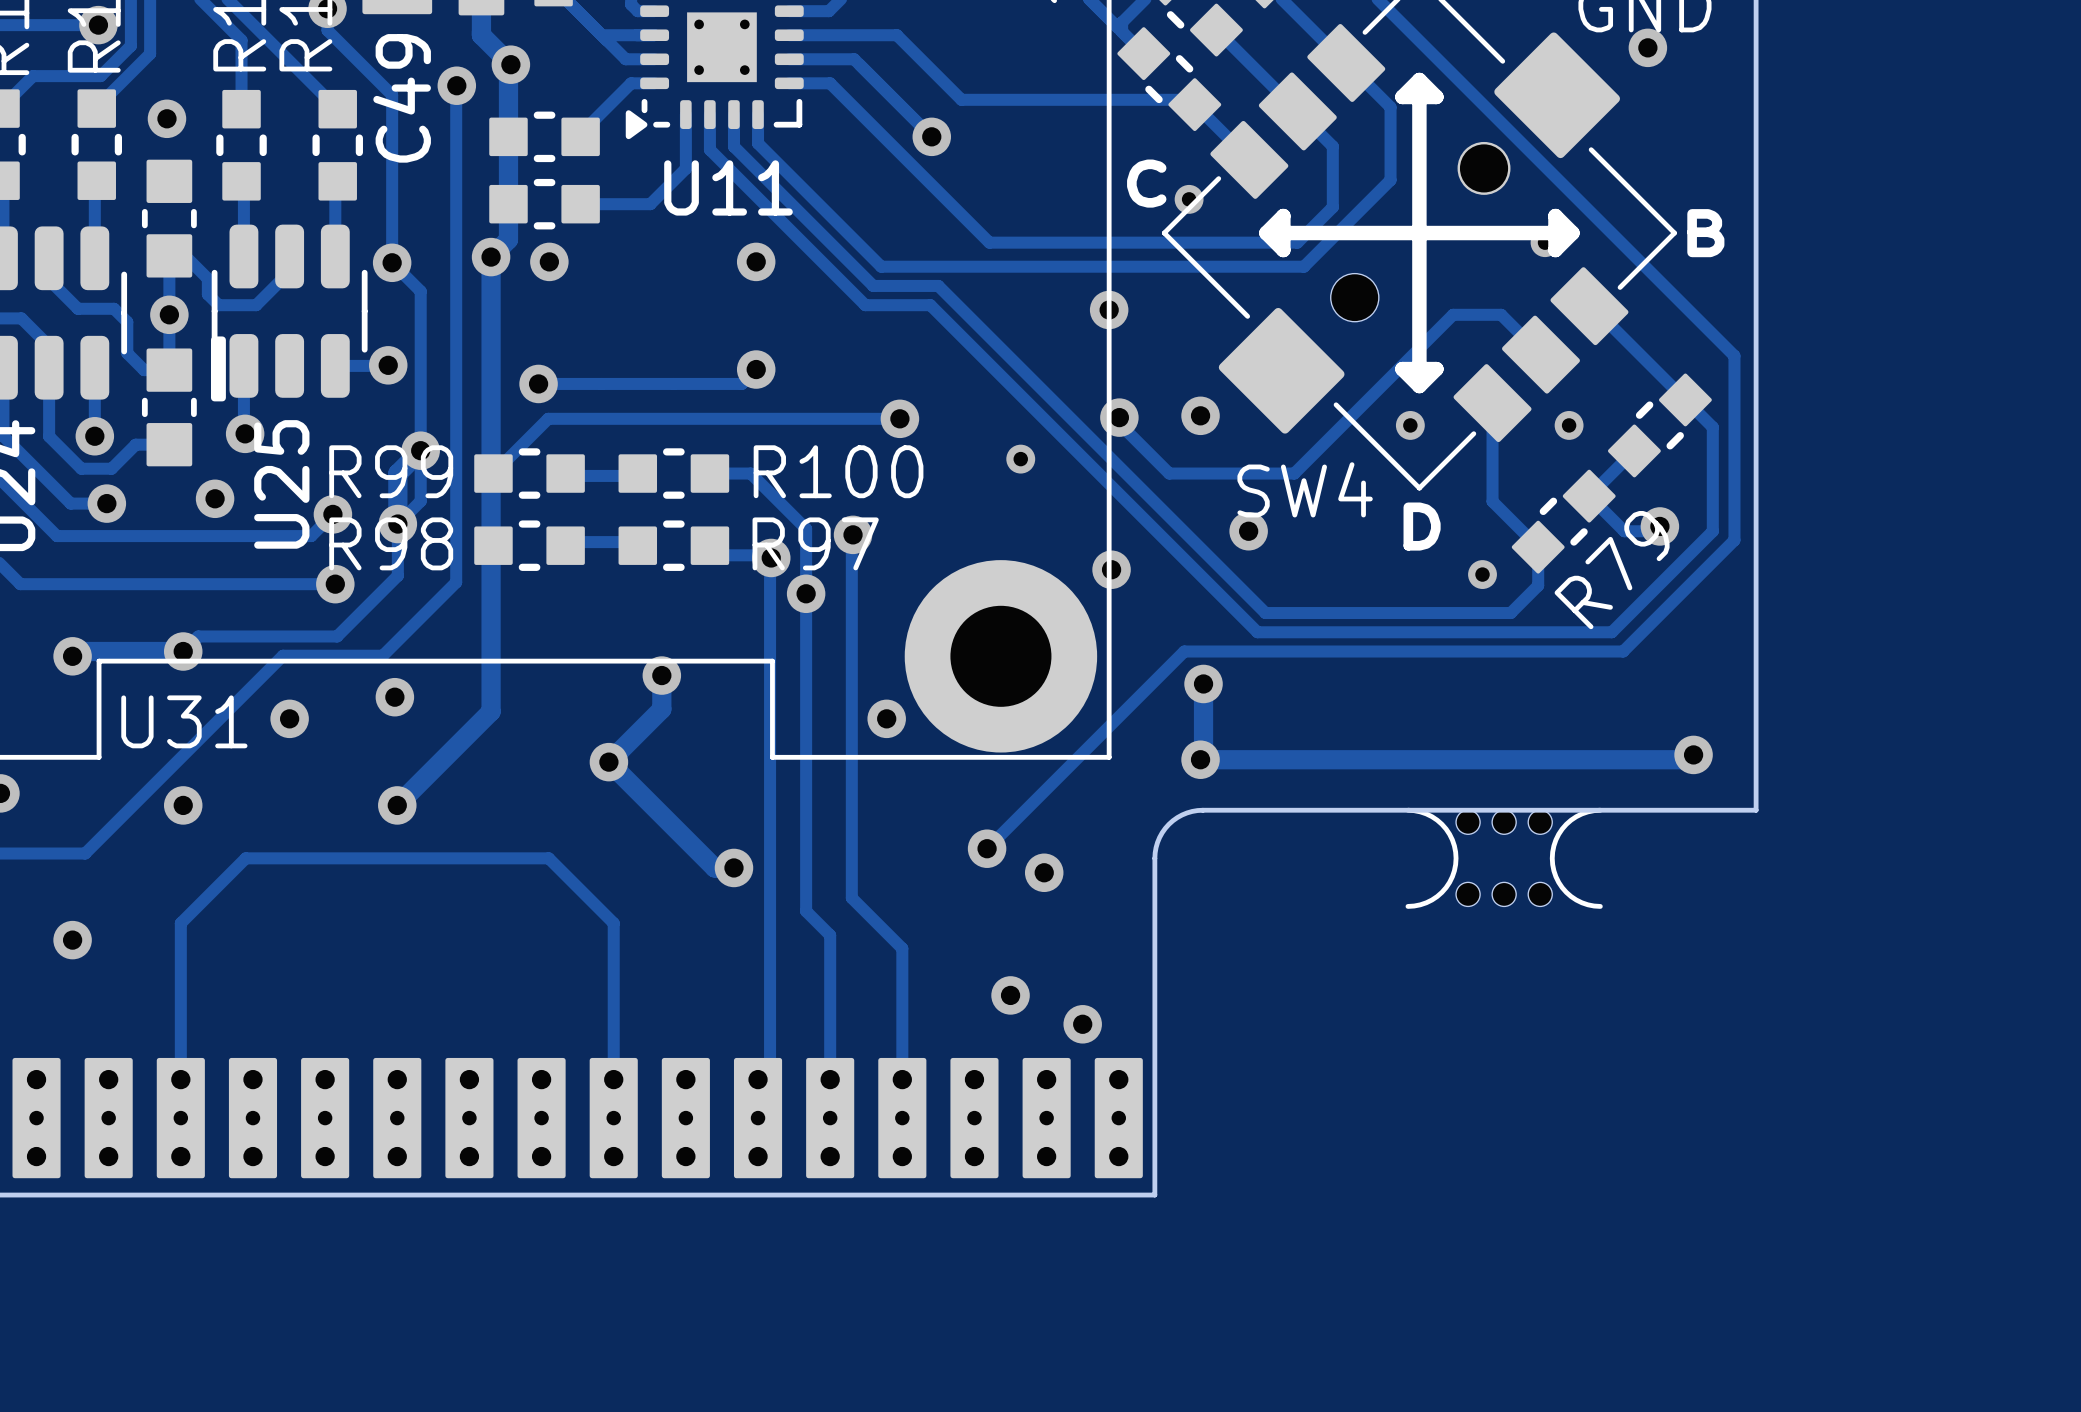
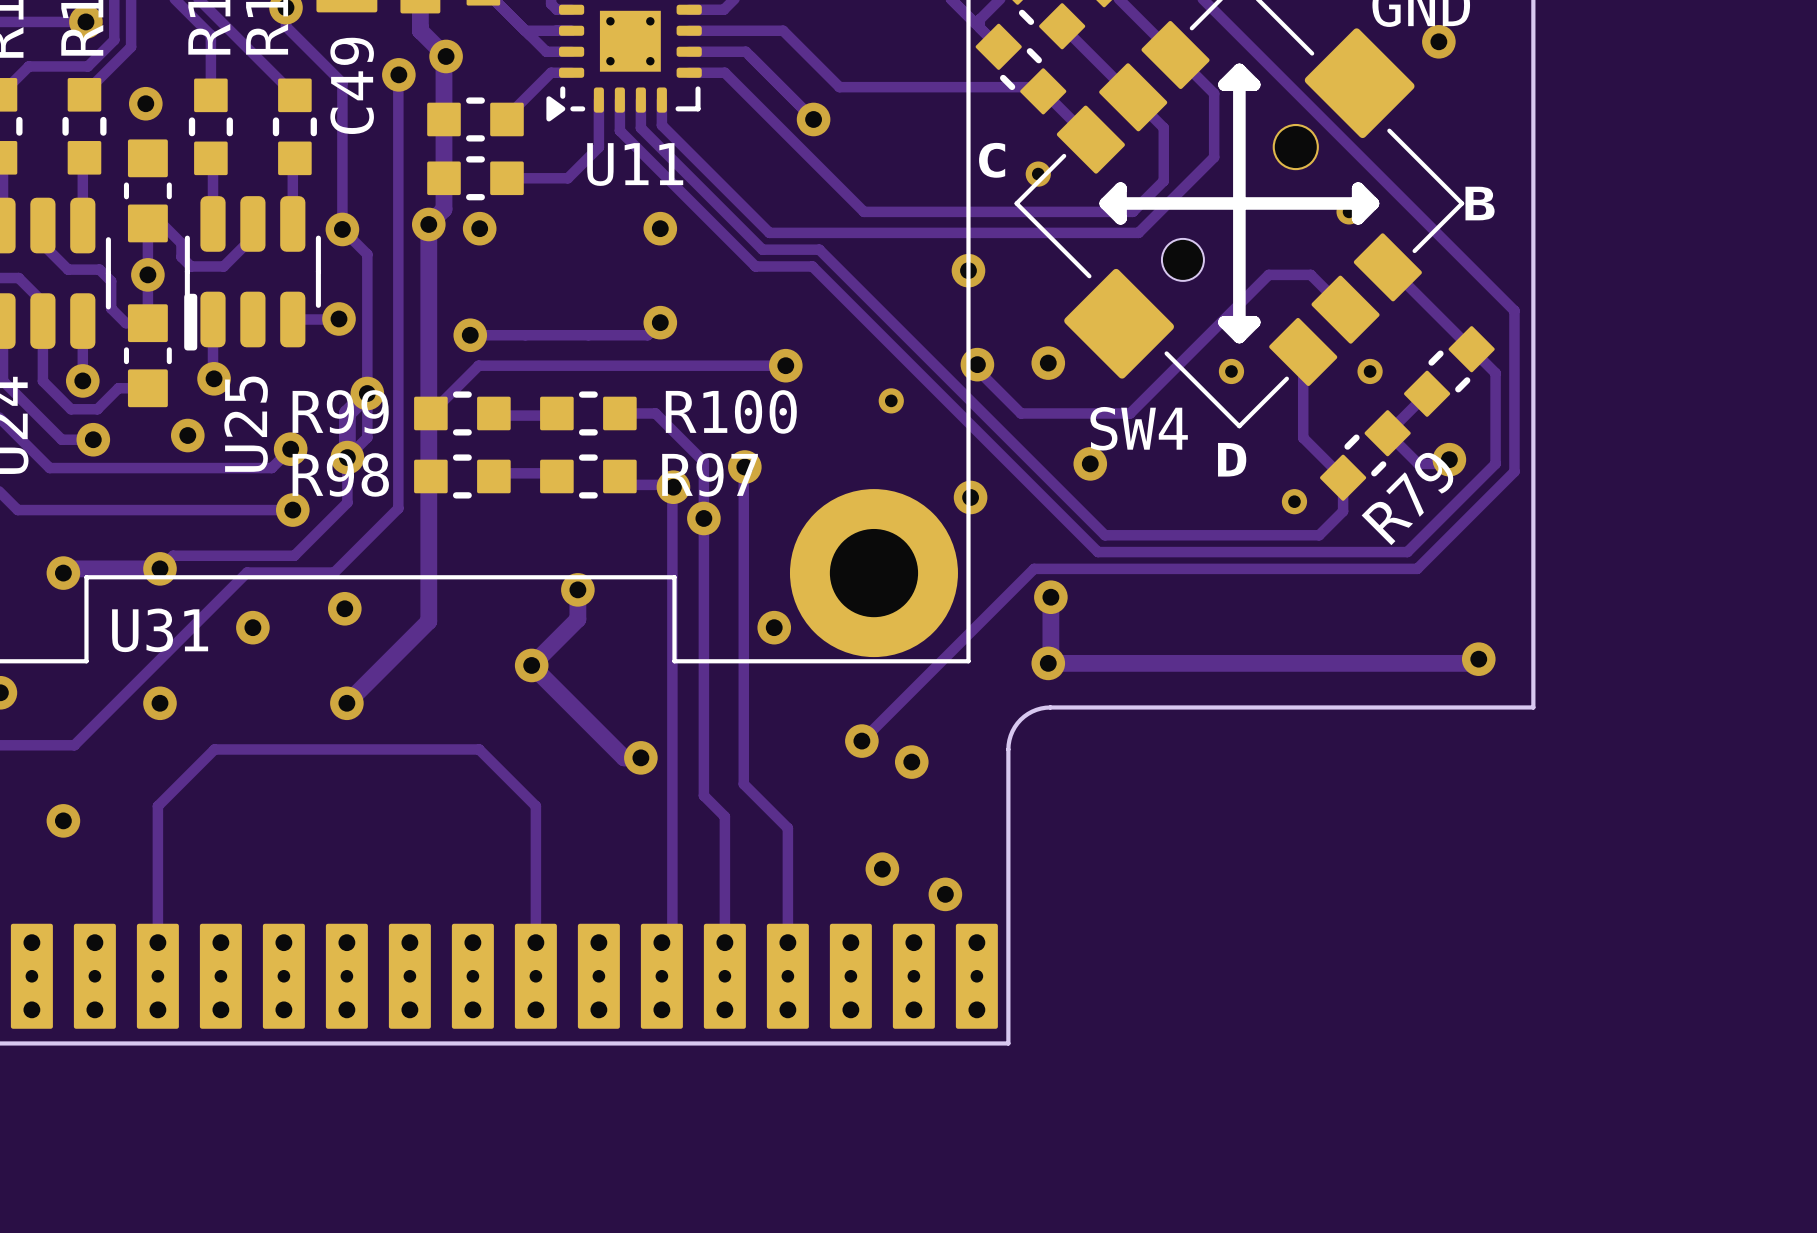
part: (1504, 858) -> none

